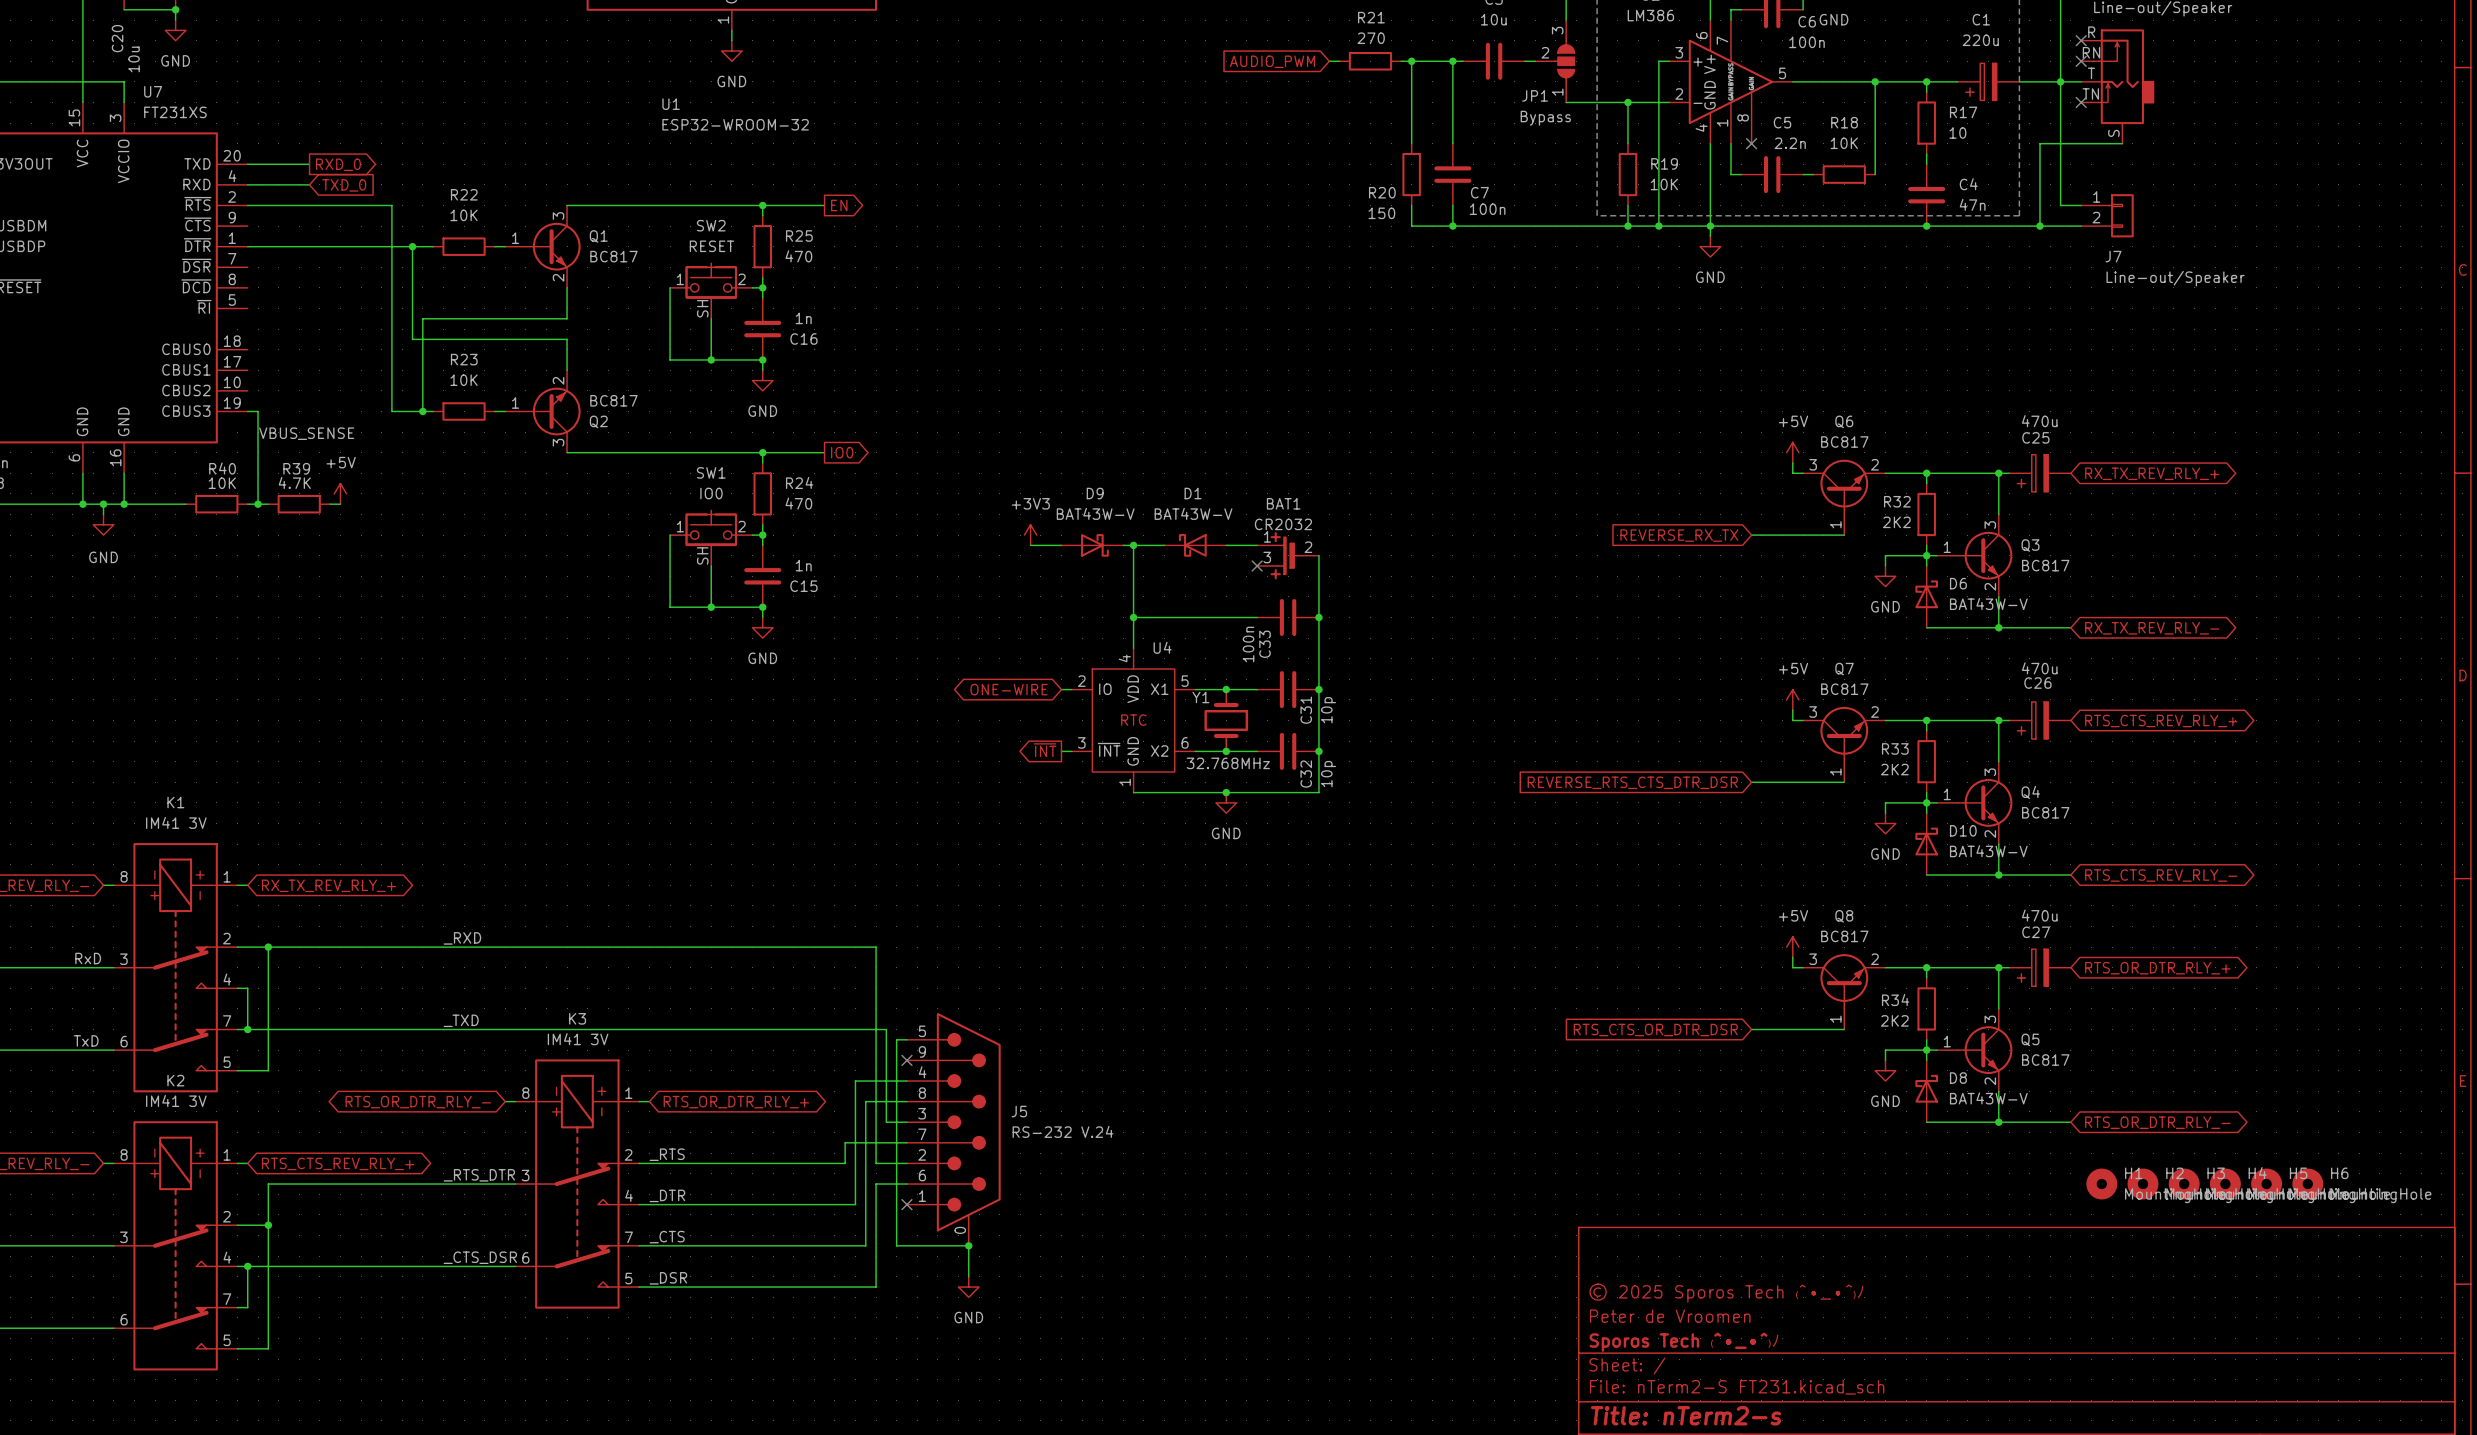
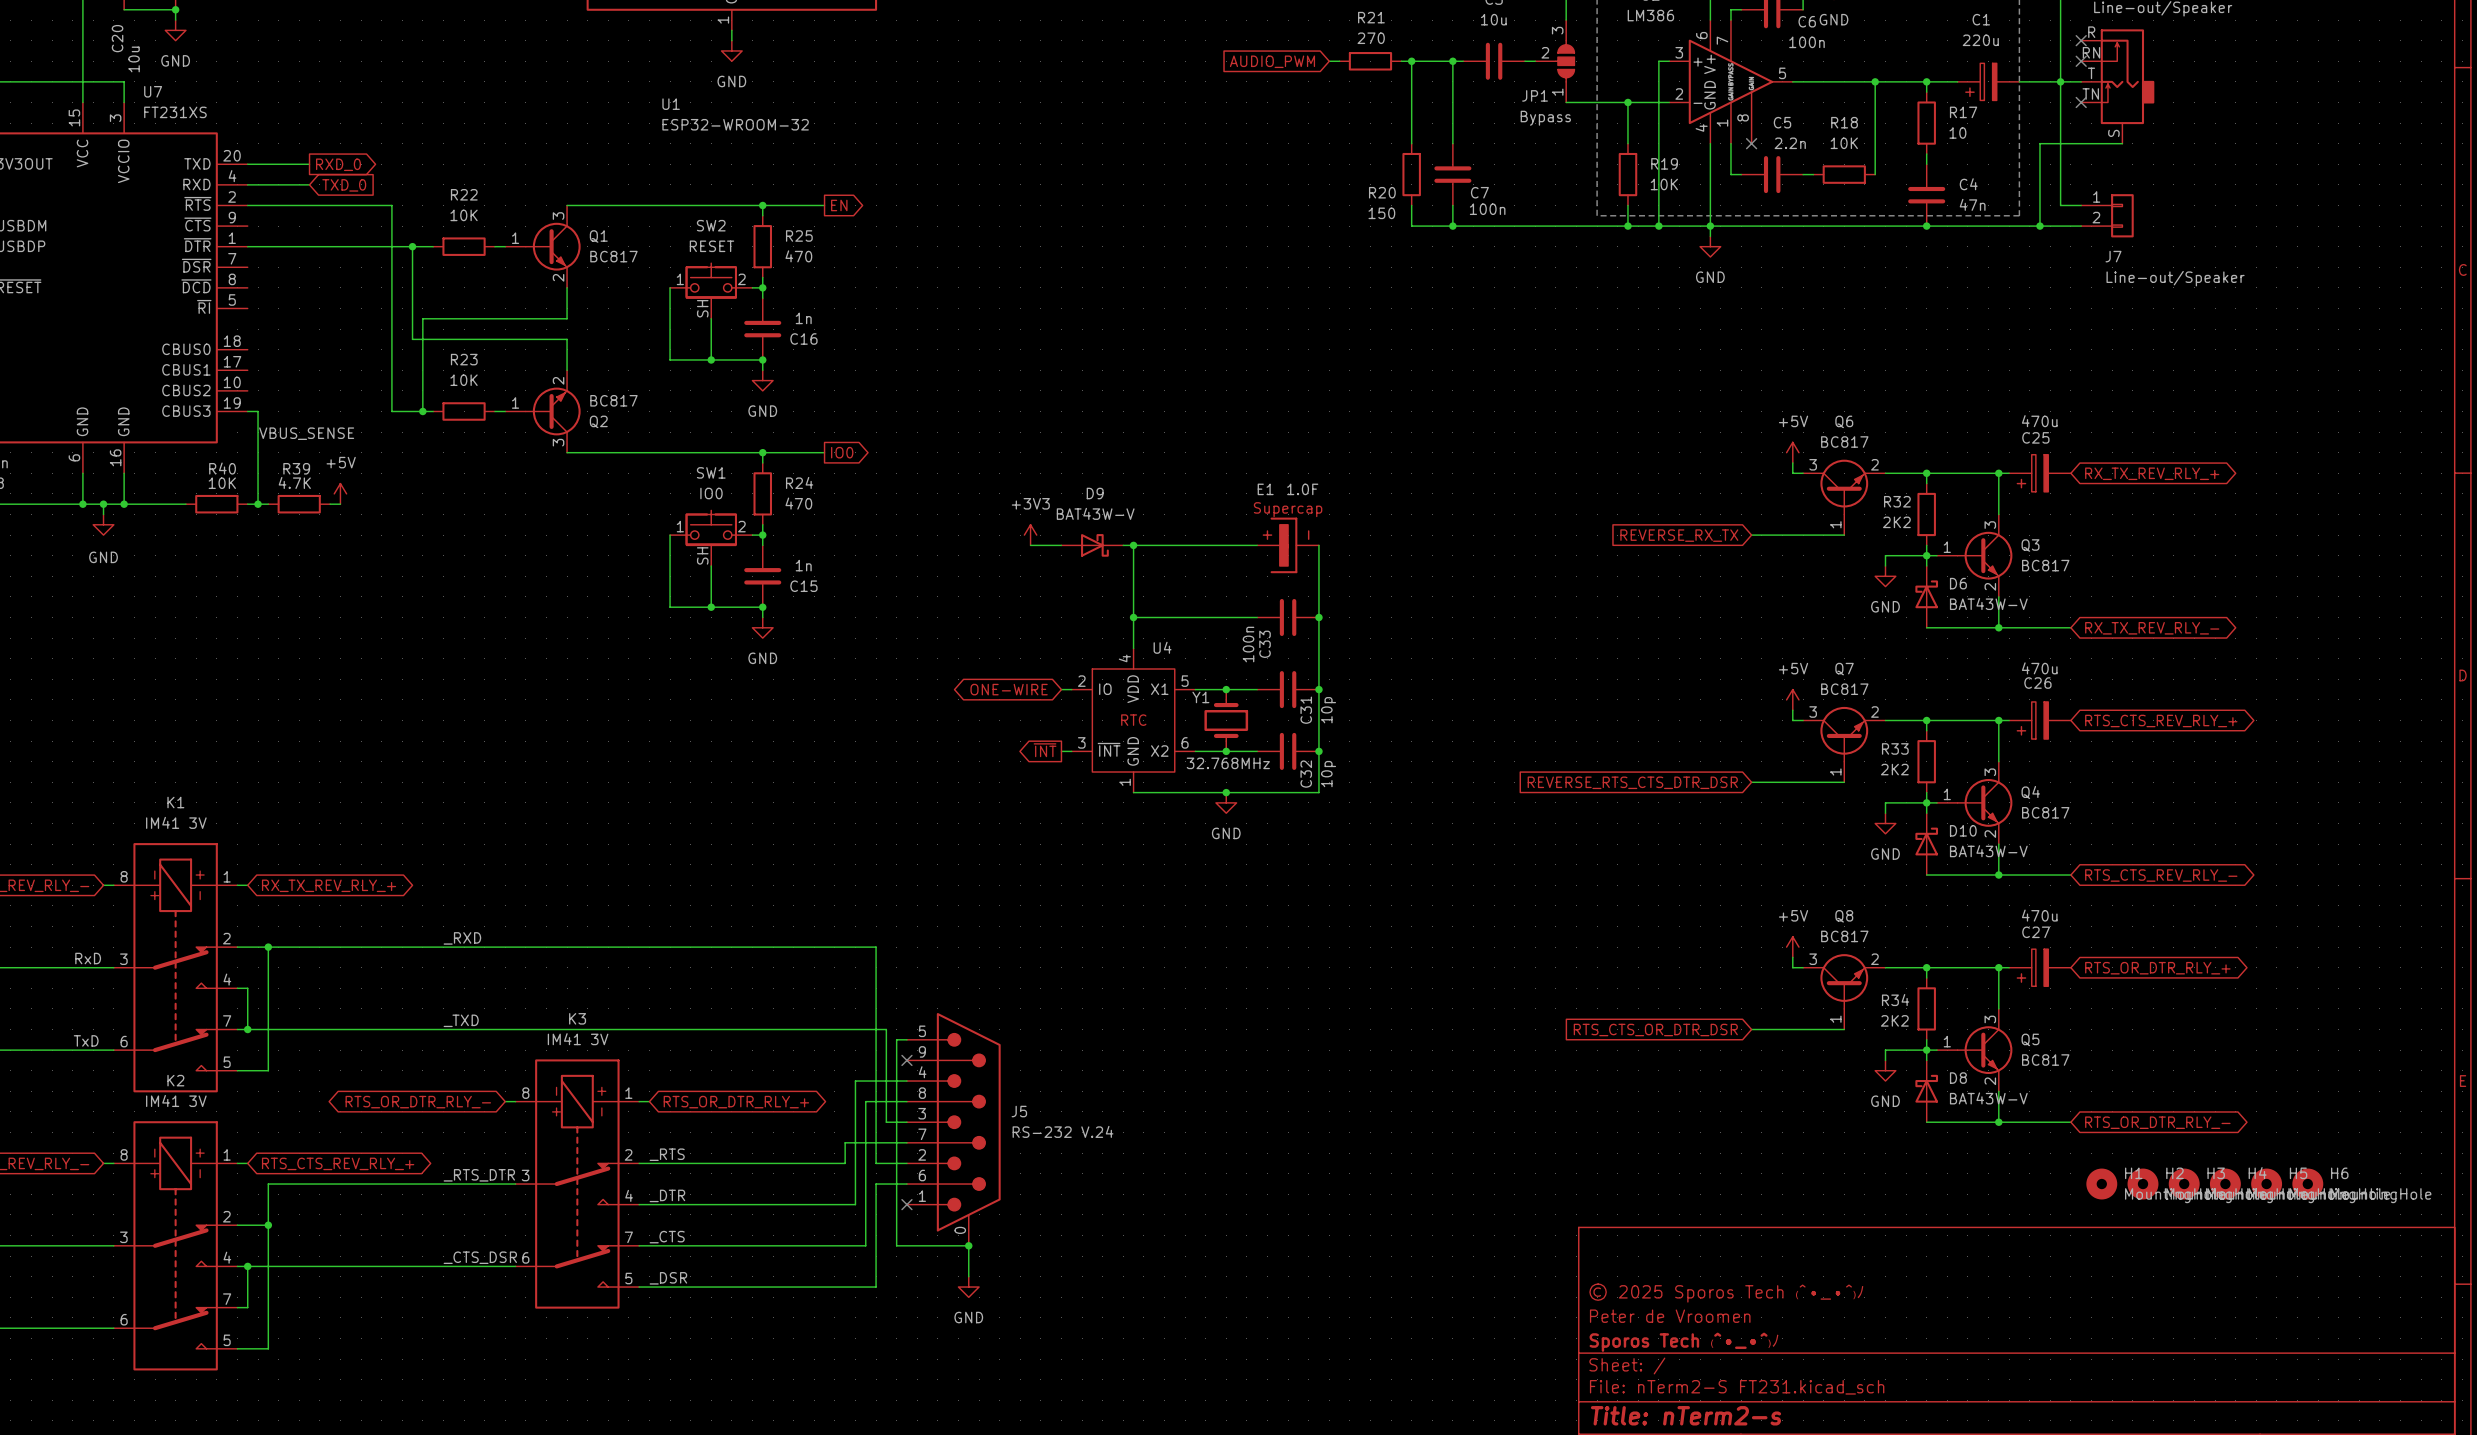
D1: BAT43W-V (1195, 545) -> none
E1: none -> 1.0F (1288, 545)
wire: none -> (1318, 545) (1318, 555)
BAT1: CR2032 (1288, 555) -> none
no-connect mark: (1257, 565) -> none

